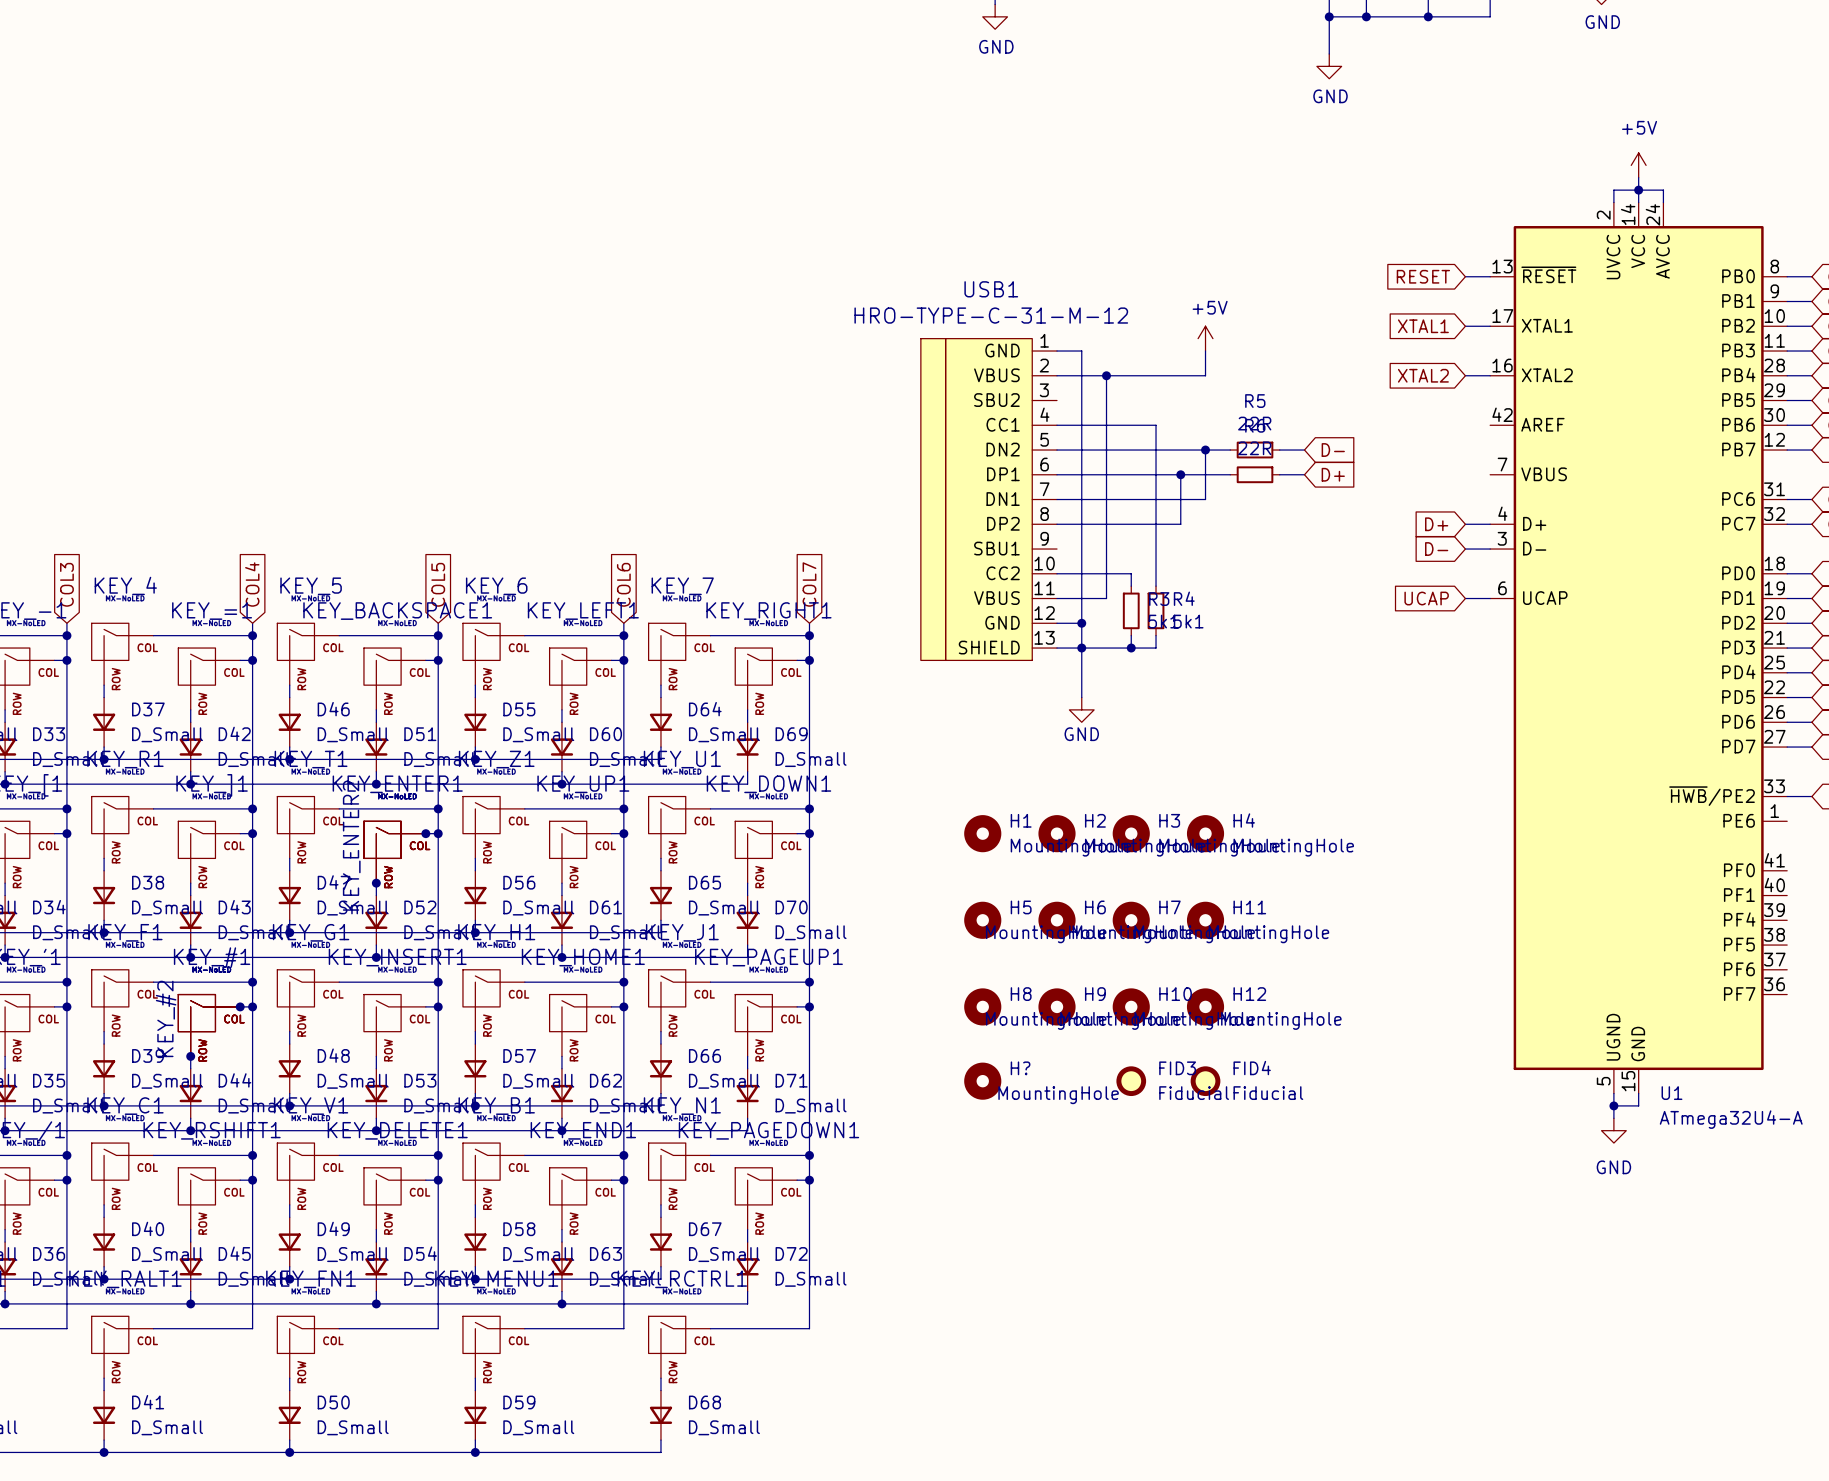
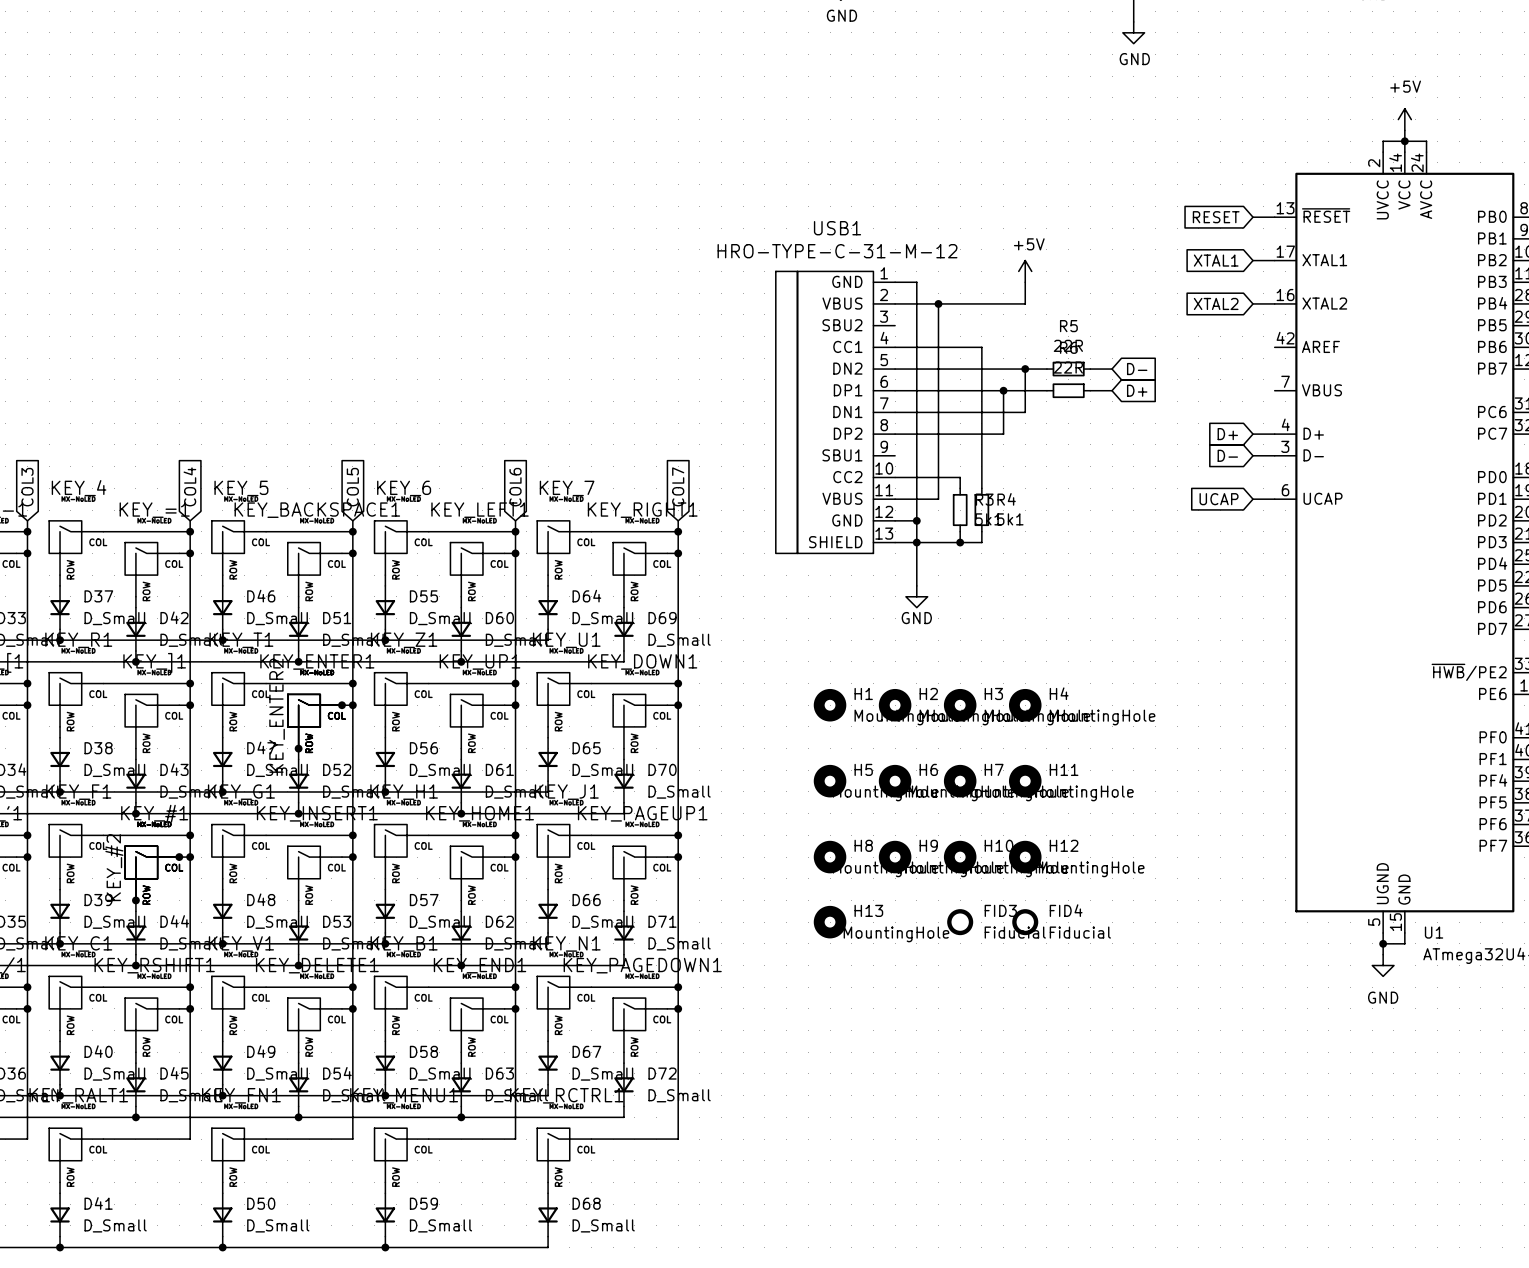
H? name: H? (1020, 1068) -> H13 (868, 910)

